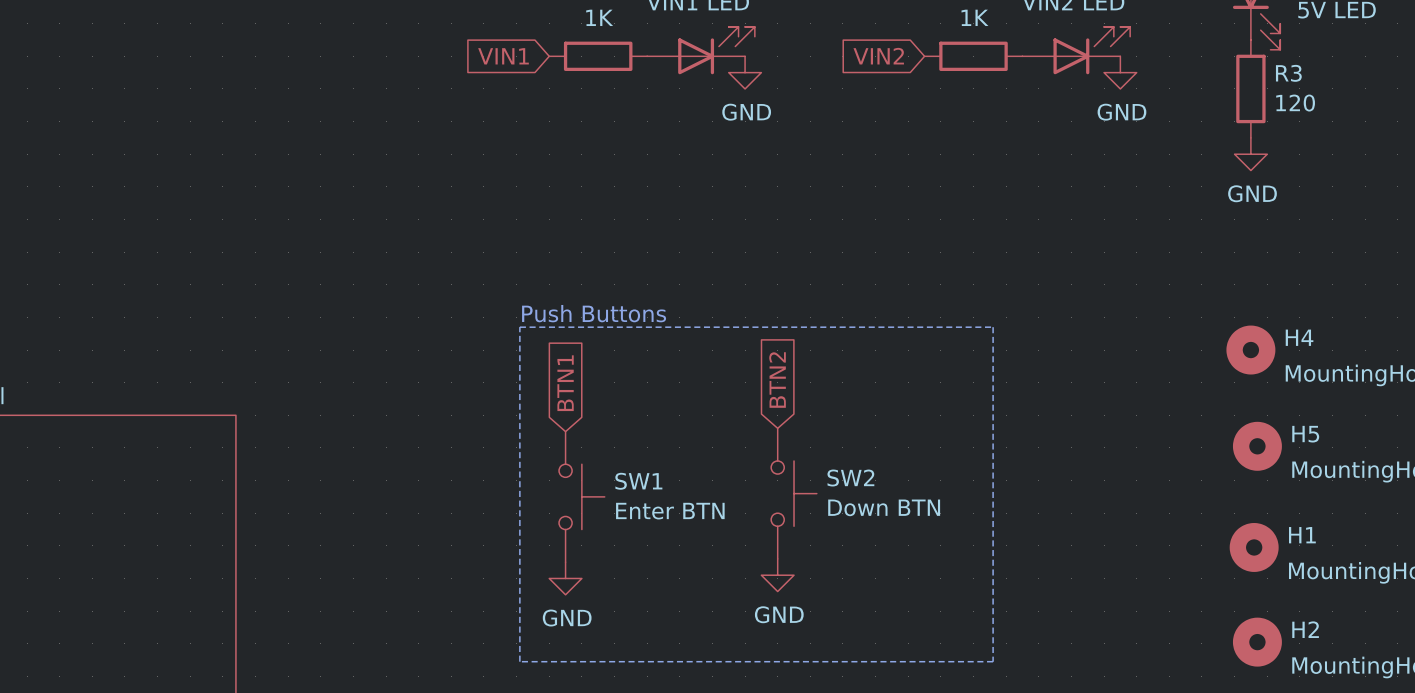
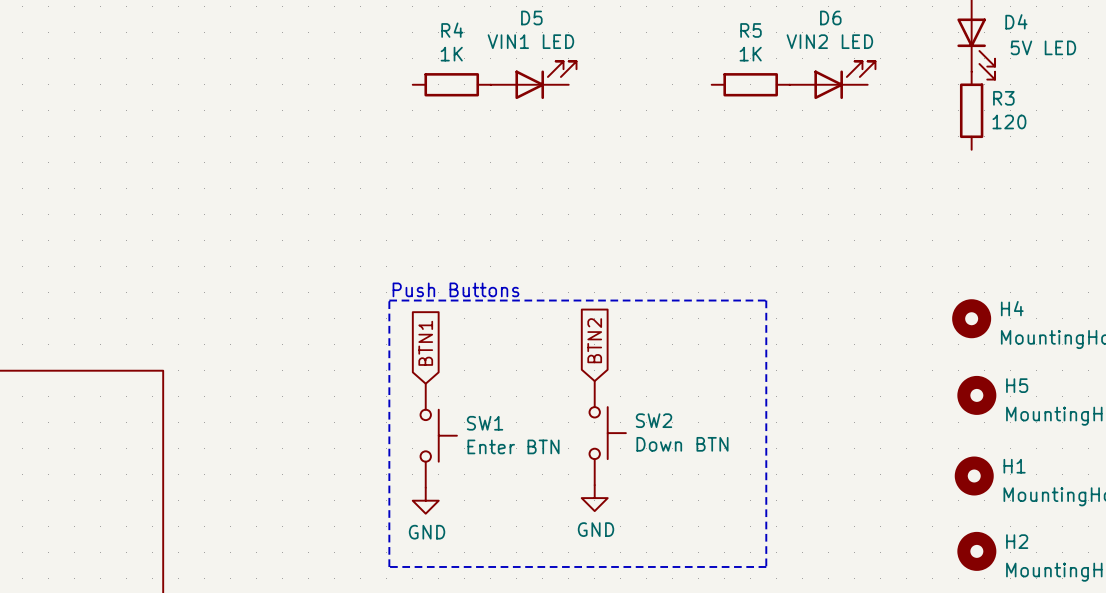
global label: VIN1 (503, 56) -> none
global label: VIN2 (878, 56) -> none
power symbol: GND (745, 72) -> none
power symbol: GND (1120, 72) -> none
power symbol: GND (1250, 154) -> none

